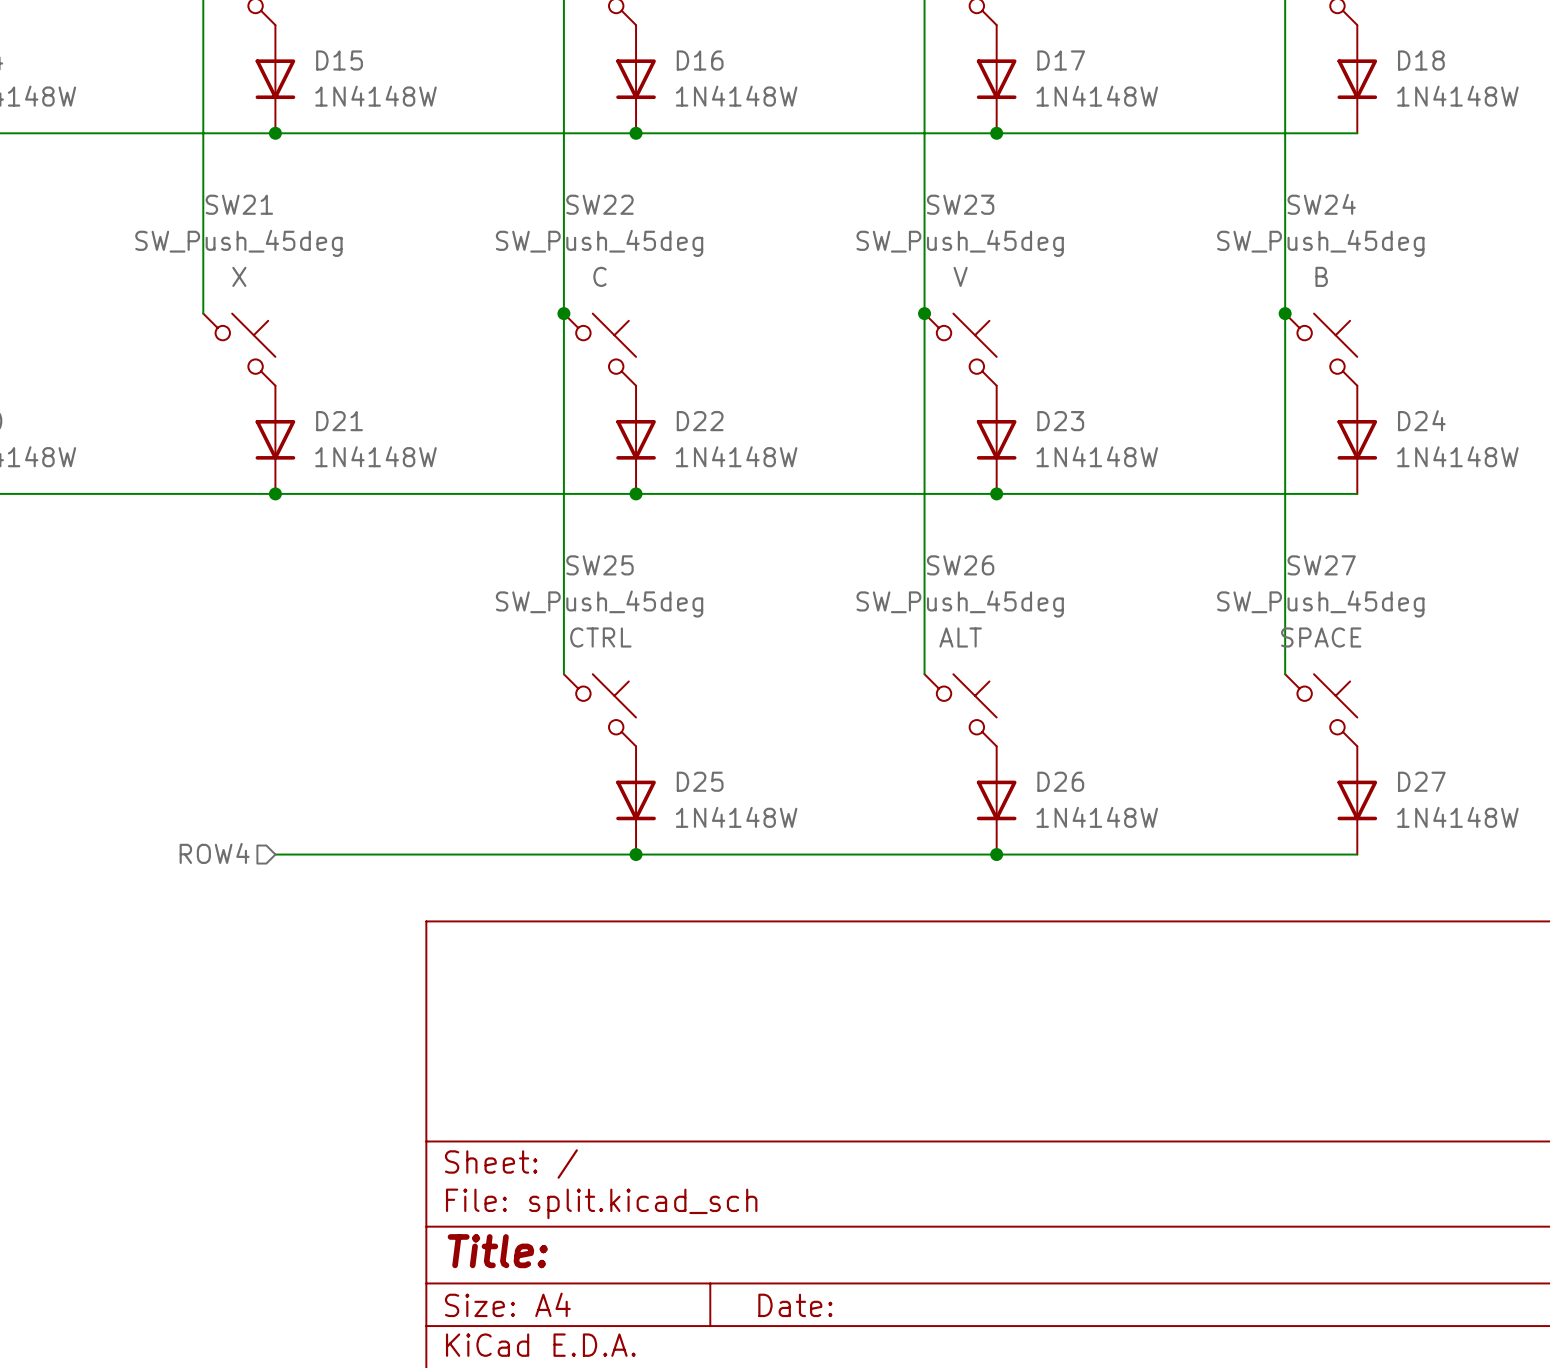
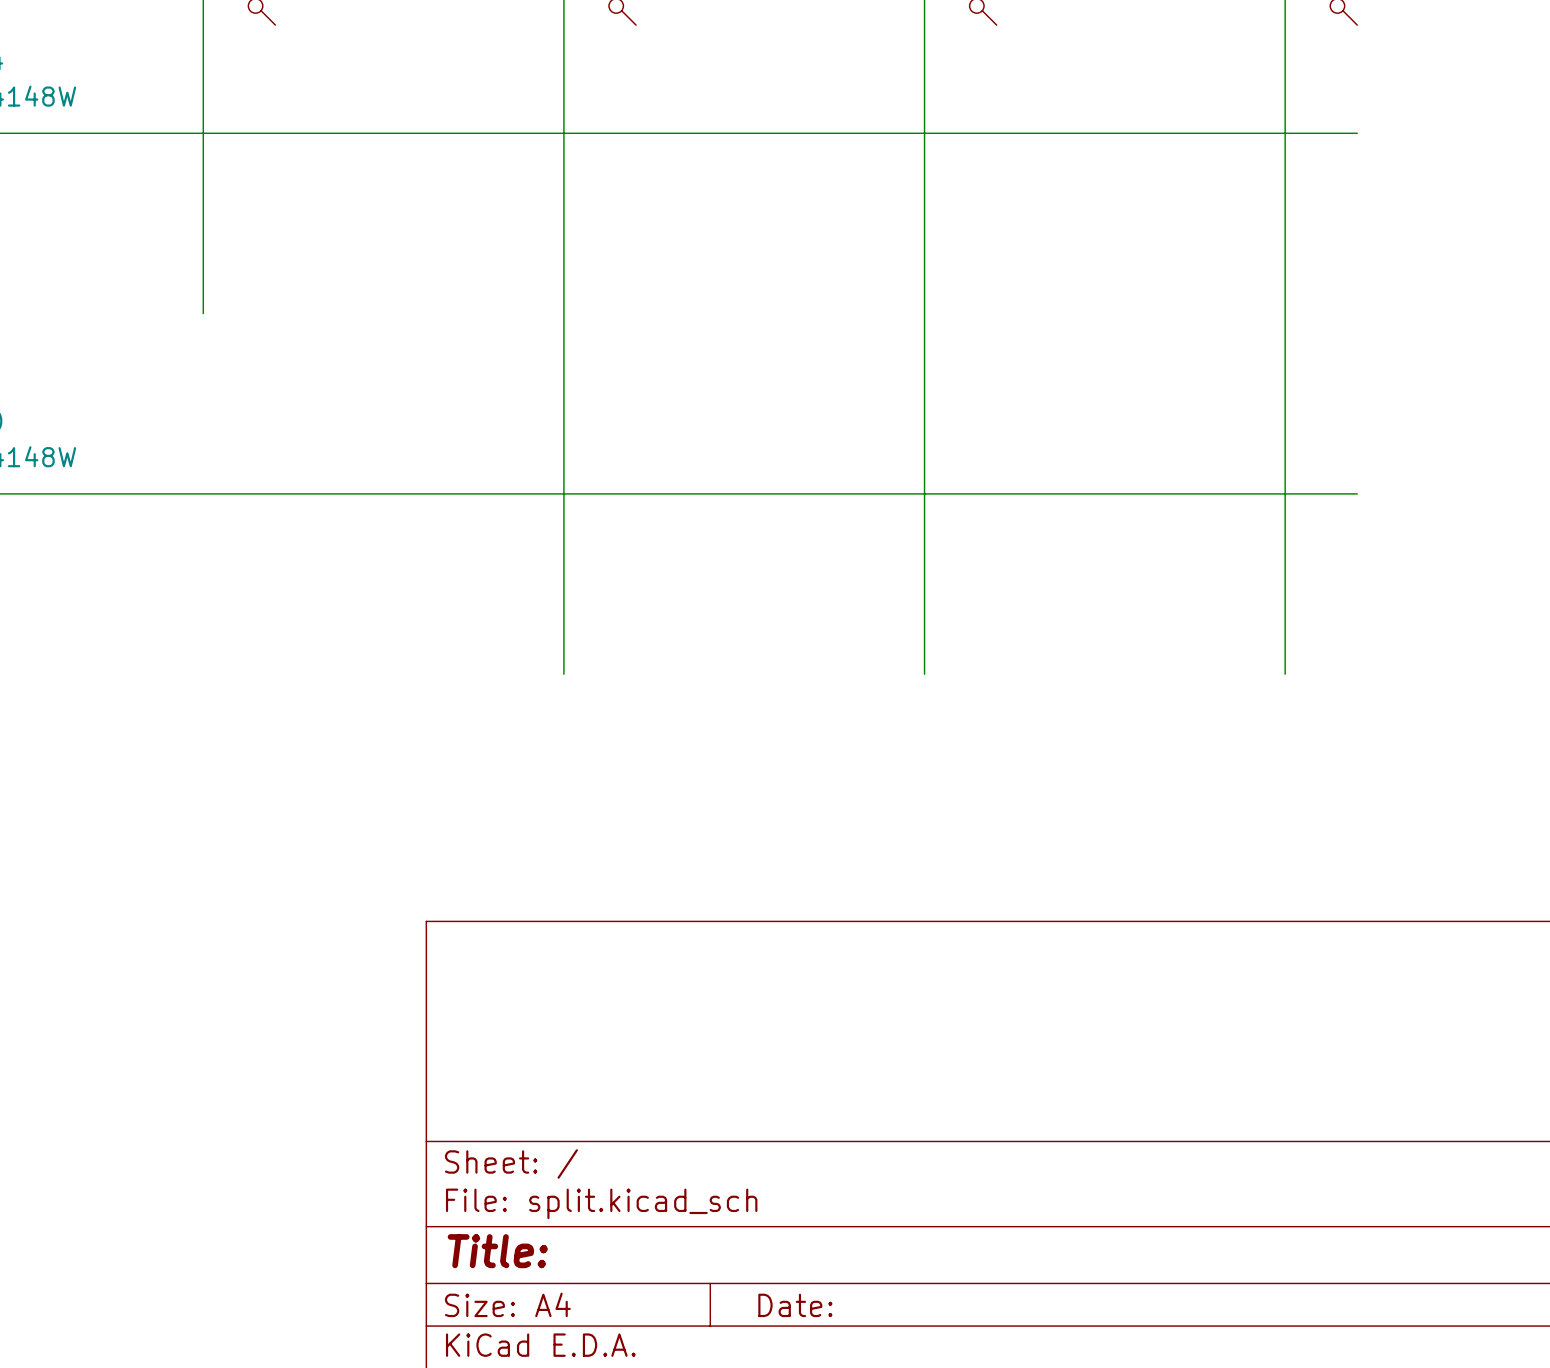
D15: 1N4148W (275, 79) -> none
D16: 1N4148W (636, 79) -> none
D17: 1N4148W (996, 79) -> none
D18: 1N4148W (1357, 79) -> none
junction: (275, 133) -> none
junction: (636, 133) -> none
junction: (996, 133) -> none
junction: (563, 313) -> none
junction: (924, 313) -> none
junction: (1285, 313) -> none
SW21: SW_Push_45deg (239, 349) -> none
SW22: SW_Push_45deg (599, 349) -> none
SW23: SW_Push_45deg (960, 349) -> none
SW24: SW_Push_45deg (1321, 349) -> none
D21: 1N4148W (275, 439) -> none
D22: 1N4148W (636, 439) -> none
D23: 1N4148W (996, 439) -> none
D24: 1N4148W (1357, 439) -> none
junction: (275, 493) -> none
junction: (636, 493) -> none
junction: (996, 493) -> none
SW25: SW_Push_45deg (599, 710) -> none
SW26: SW_Push_45deg (960, 710) -> none
SW27: SW_Push_45deg (1321, 710) -> none
D25: 1N4148W (636, 800) -> none
D26: 1N4148W (996, 800) -> none
D27: 1N4148W (1357, 800) -> none
hierarchical label: ROW4 (214, 853) -> none
wire: (275, 854) (1357, 854) -> none
junction: (636, 854) -> none
junction: (996, 854) -> none

